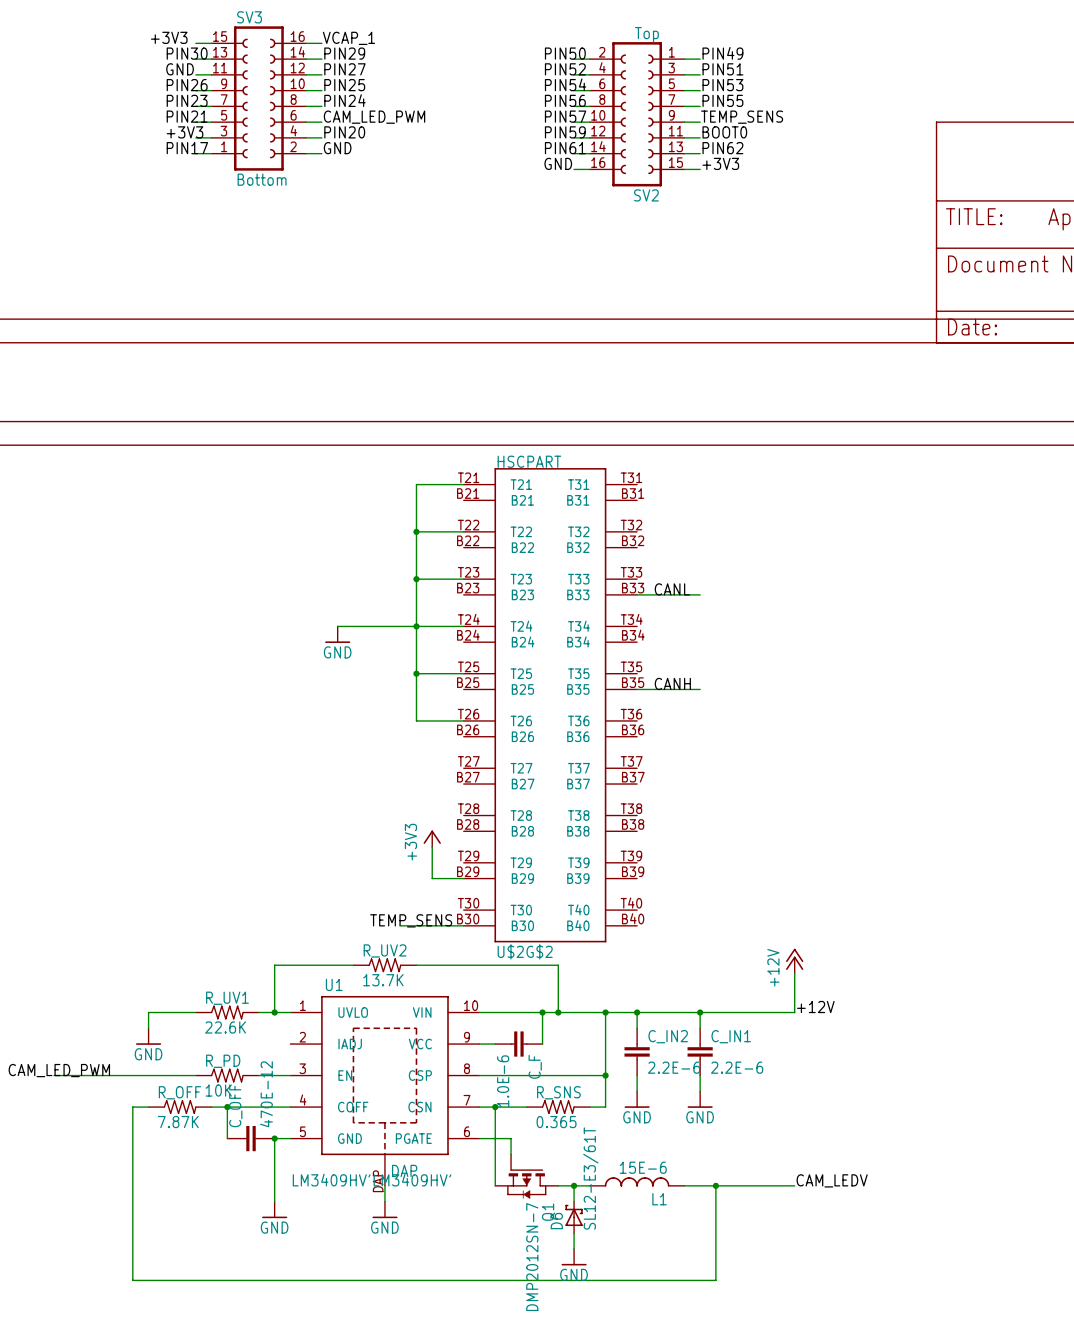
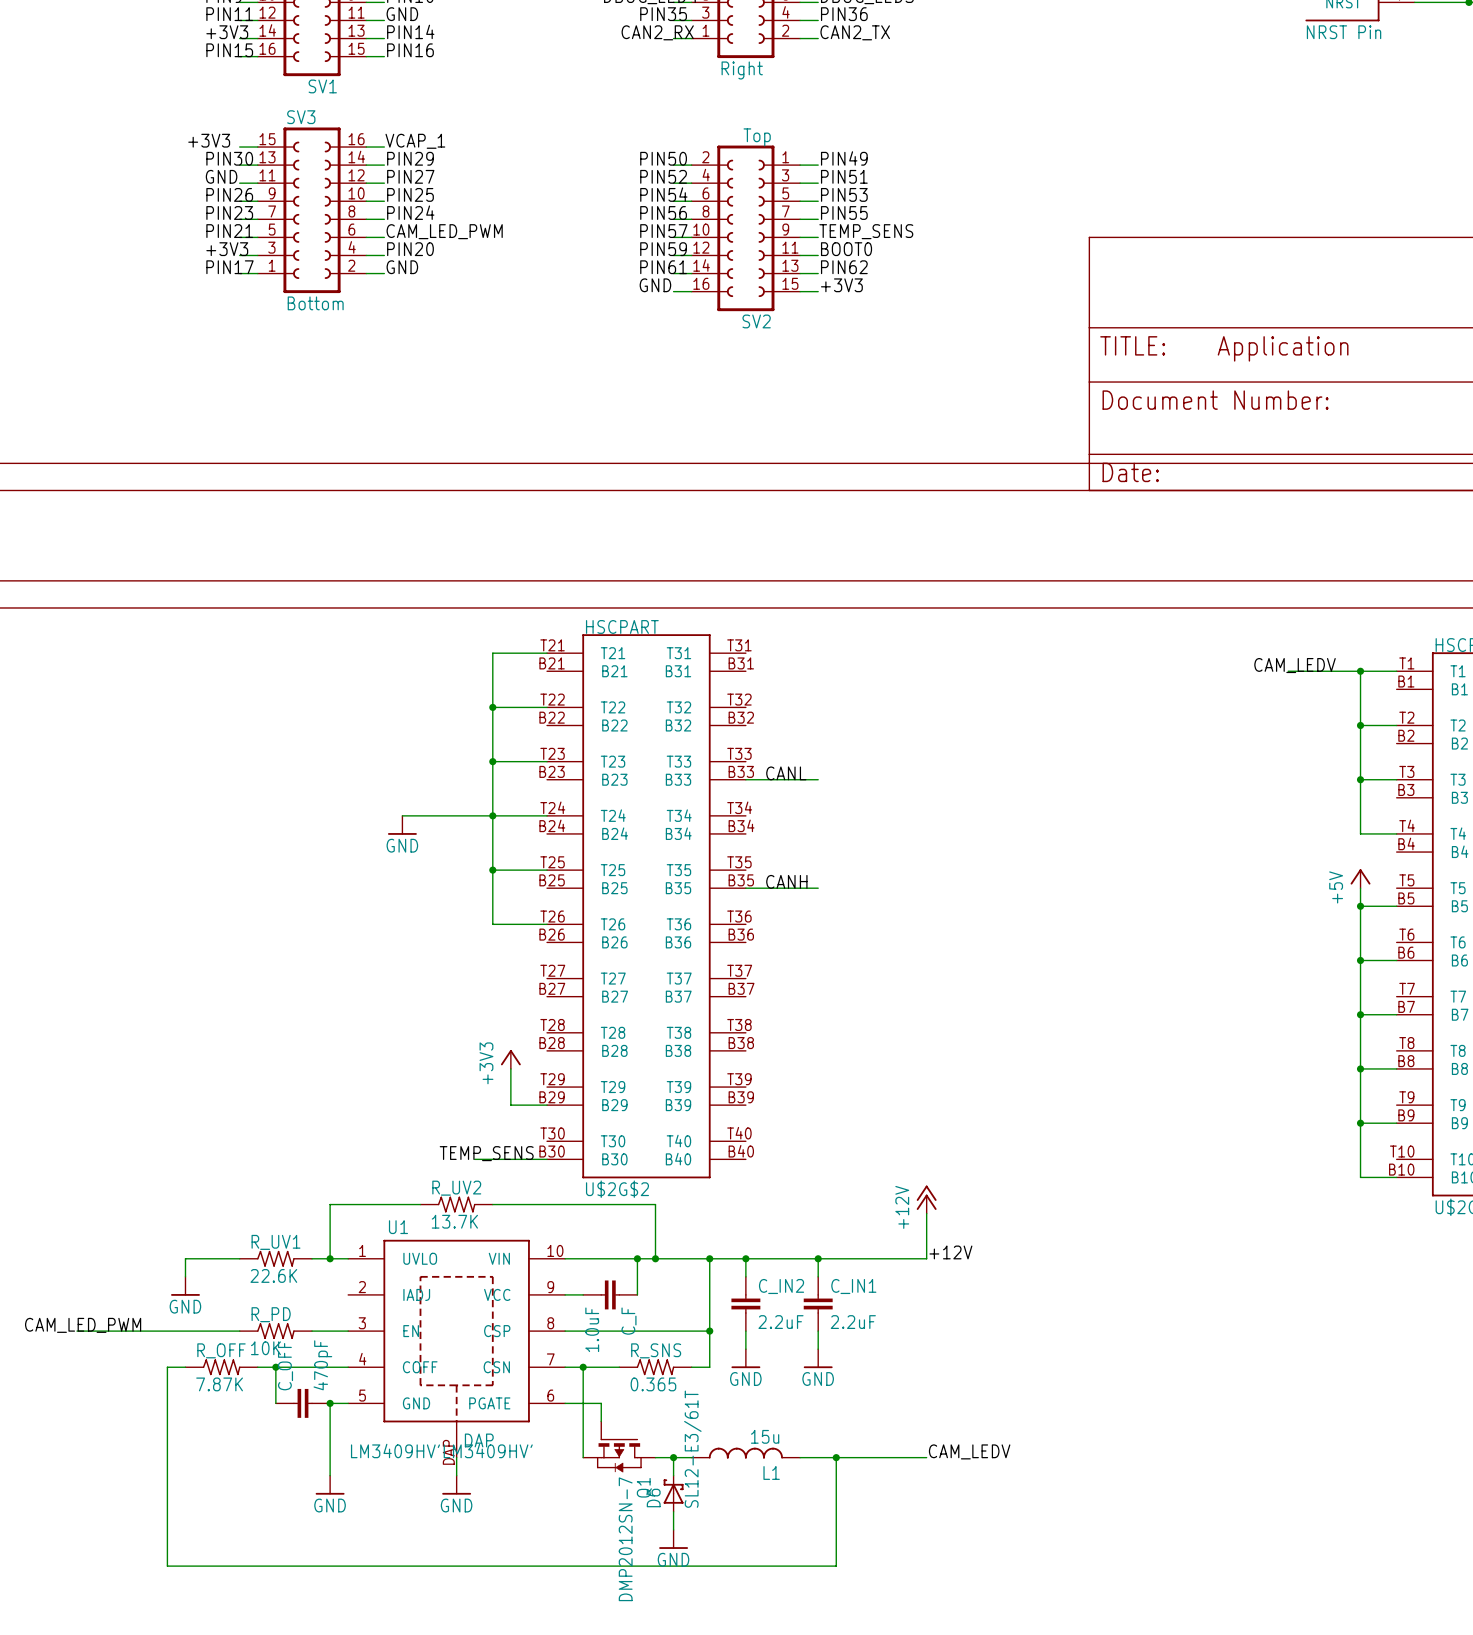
C_IN2 value: 2.2E-6 (674, 1067) -> 2.2uF (780, 1322)
C_IN1 value: 2.2E-6 (737, 1067) -> 2.2uF (853, 1322)
C_F value: 1.0E-6 (503, 1081) -> 1.0uF (592, 1329)
C_OFF value: 470E-12 (266, 1094) -> 470pF (322, 1365)
L1 value: 15E-6 (643, 1167) -> 15u (765, 1436)

